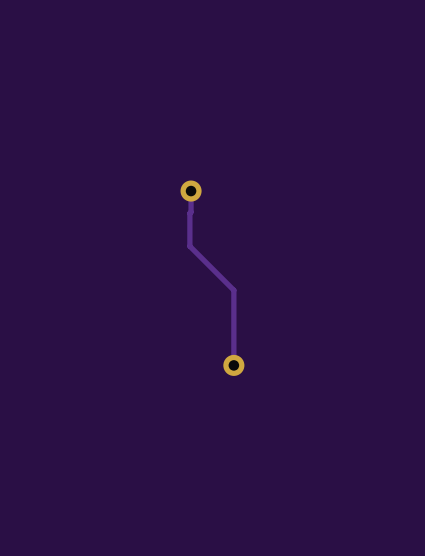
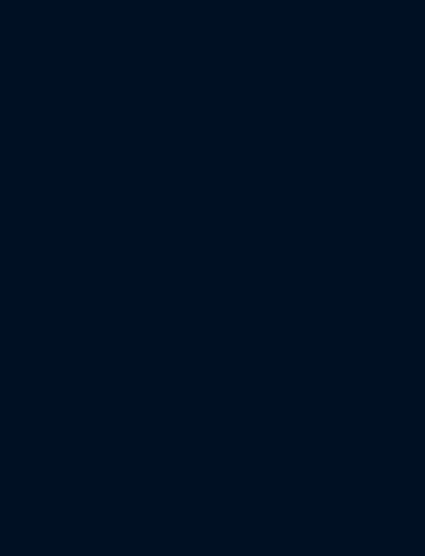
track: (191, 191) (189, 246) (233, 290) (233, 365) -> none
via: (191, 191) -> none
via: (233, 365) -> none

